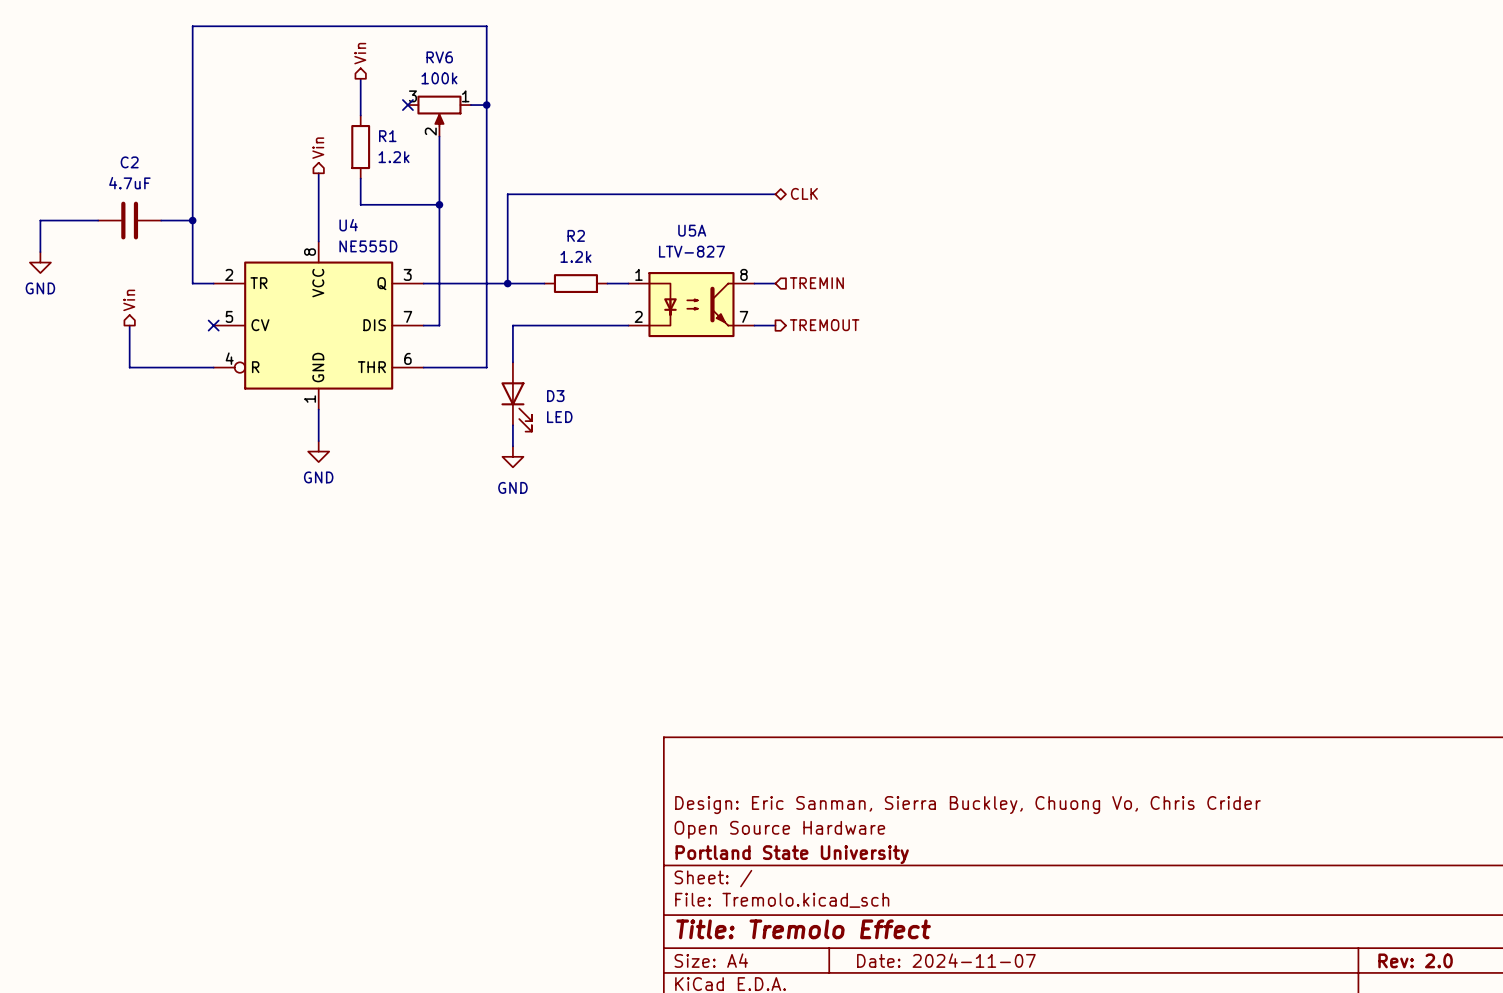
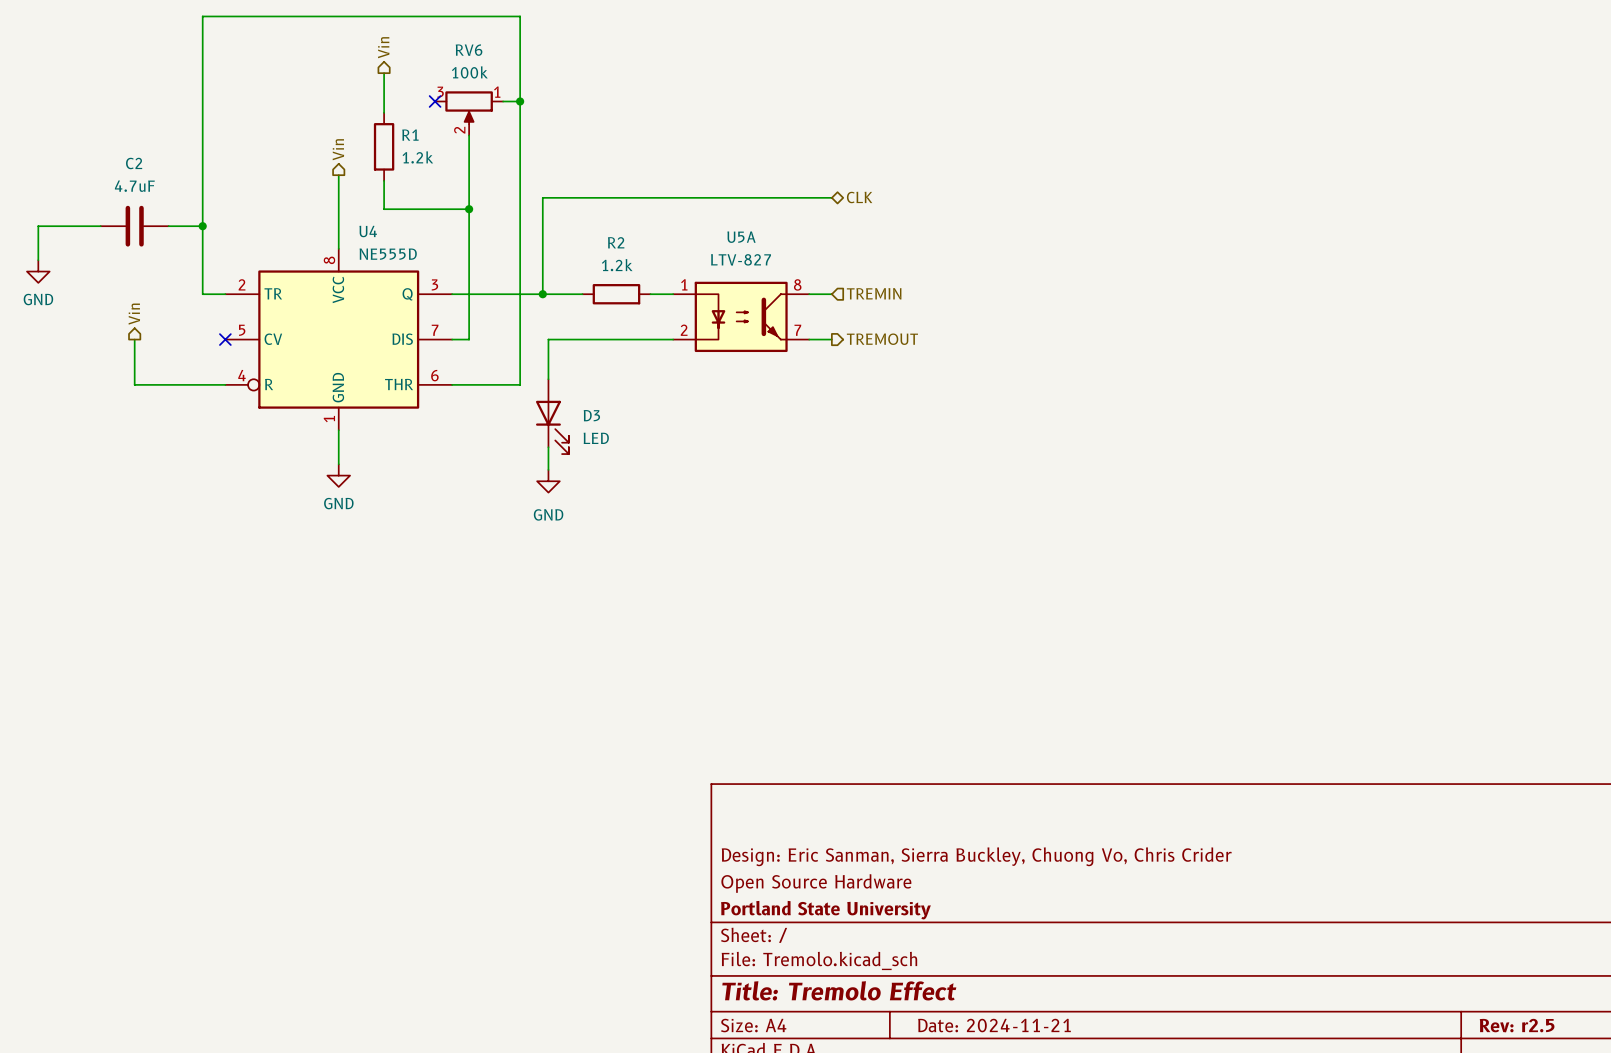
title block: Date: 2024-11-07 (946, 960) -> Date: 2024-11-21 (994, 1025)
title block: Rev: 2.0 (1415, 960) -> Rev: r2.5 (1517, 1025)

